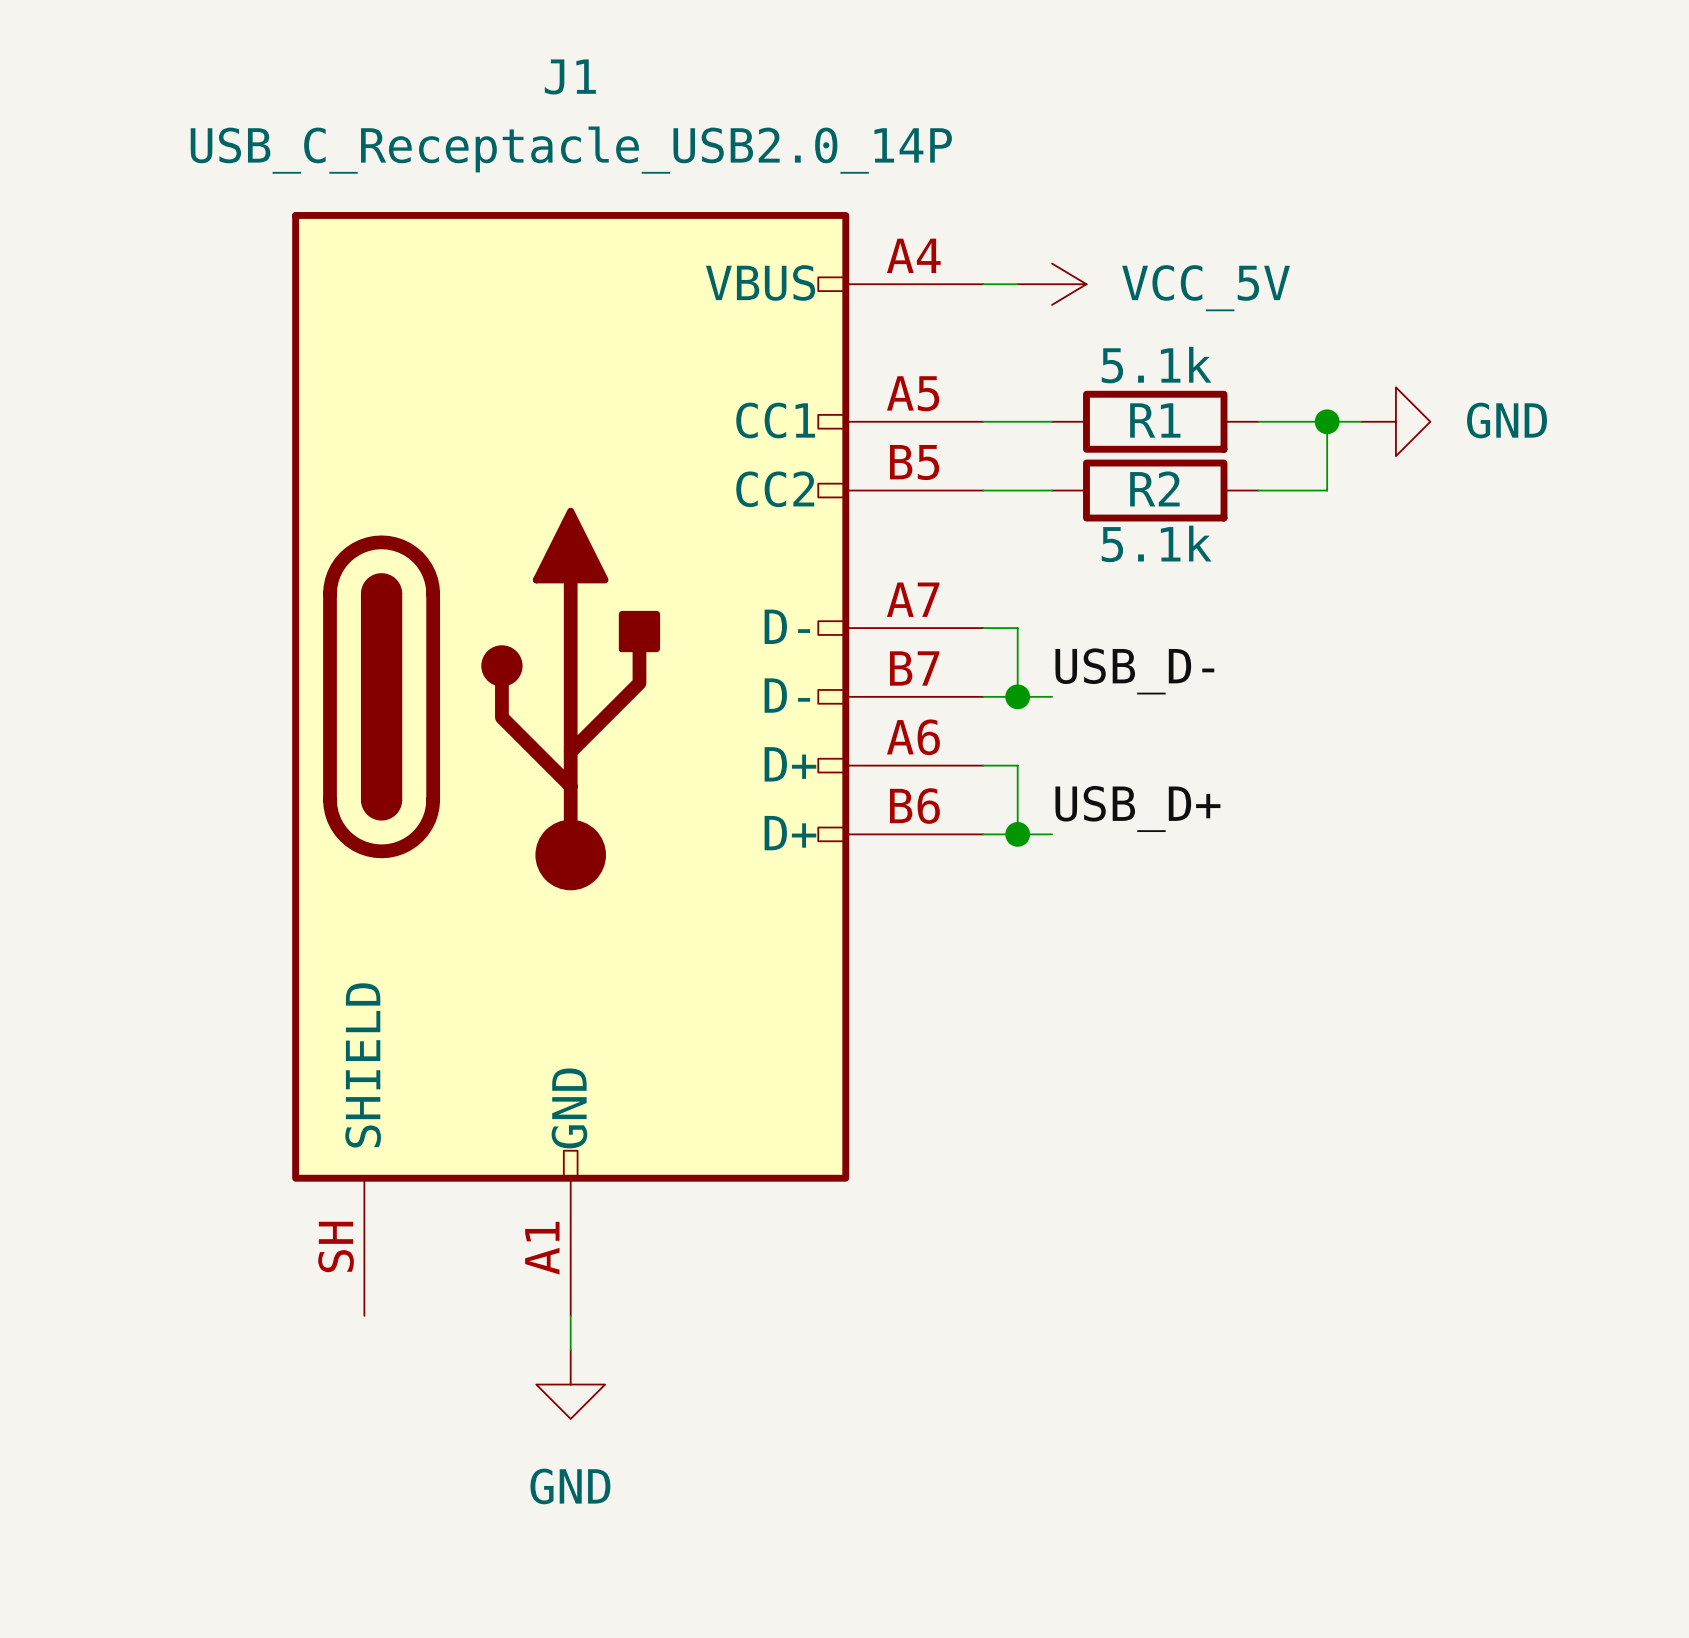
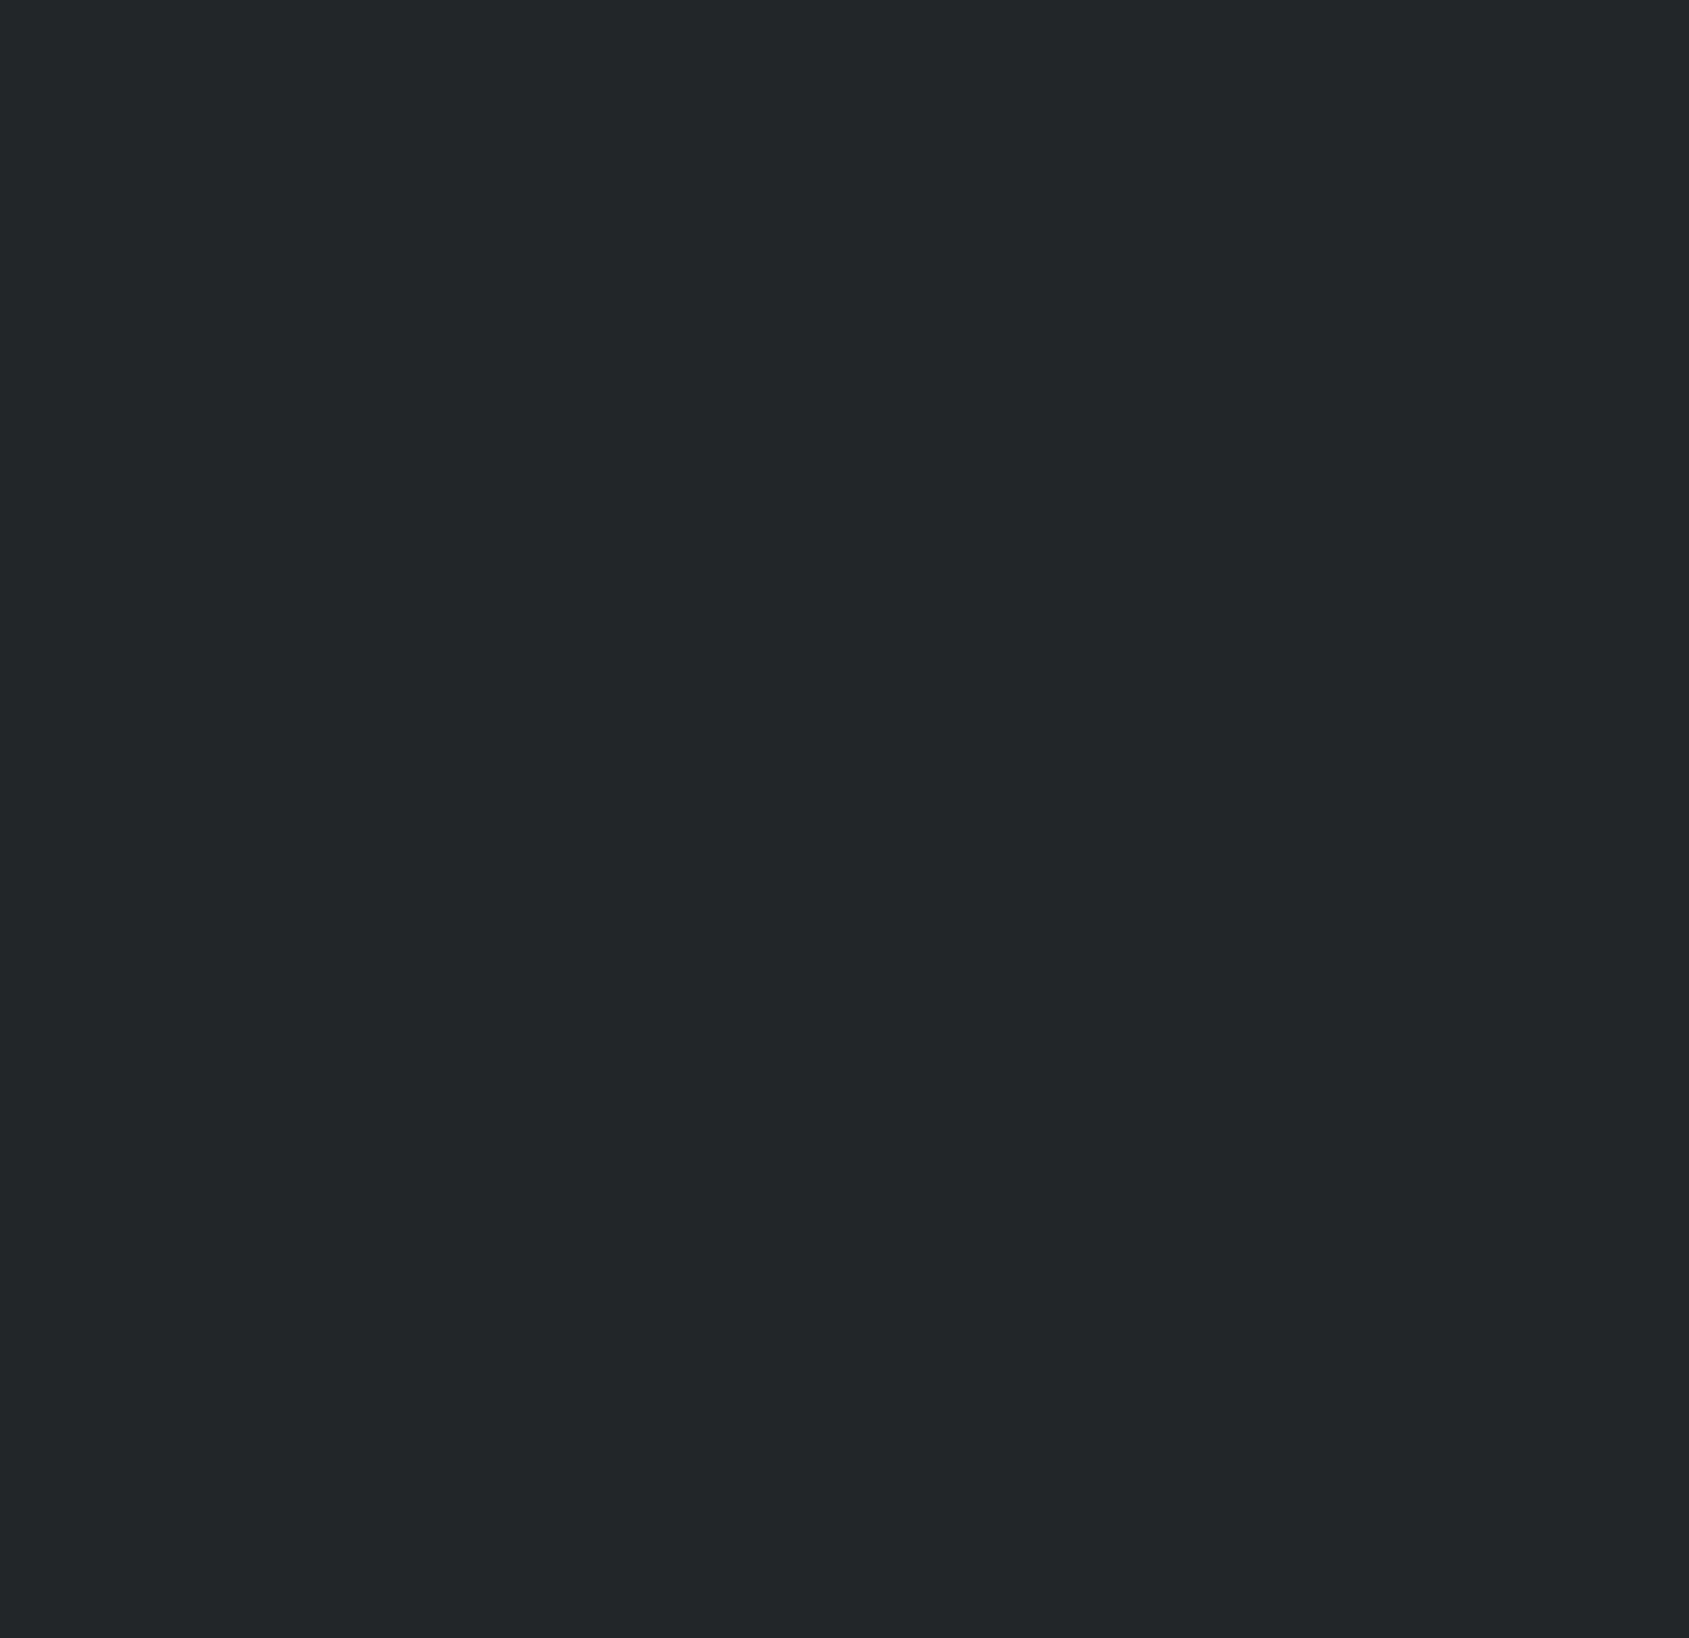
wire: (983, 284) (1017, 284) -> none
power symbol: VCC_5V (1052, 284) -> none
wire: (983, 421) (1052, 421) -> none
R1: 5.1k (1155, 421) -> none
wire: (1258, 421) (1361, 421) -> none
wire: (1327, 421) (1327, 490) (1258, 490) -> none
junction: (1327, 421) -> none
power symbol: GND (1395, 421) -> none
wire: (983, 490) (1052, 490) -> none
R2: 5.1k (1155, 490) -> none
wire: (983, 628) (1017, 628) (1017, 696) -> none
label: USB_D- (1134, 671) -> none
wire: (983, 696) (1052, 696) -> none
junction: (1017, 696) -> none
J1: USB_C_Receptacle_USB2.0_14P (637, 763) -> none
wire: (983, 765) (1017, 765) (1017, 834) -> none
label: USB_D+ (1137, 808) -> none
wire: (983, 834) (1052, 834) -> none
junction: (1017, 834) -> none
wire: (570, 1315) (570, 1350) -> none
power symbol: GND (570, 1384) -> none

